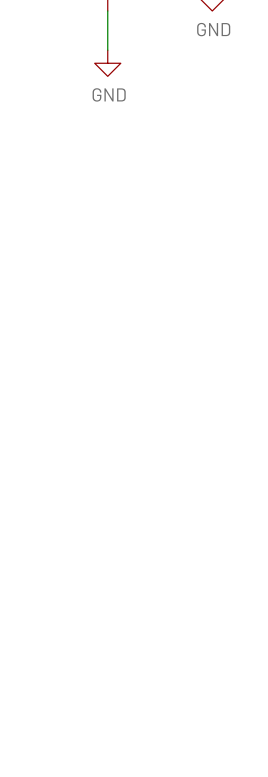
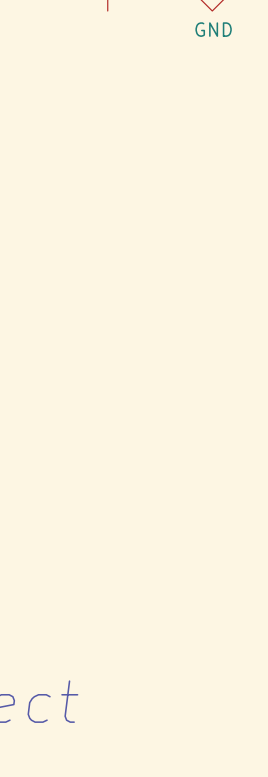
wire: (107, 10) (107, 50) -> none
power symbol: GND (107, 63) -> none

